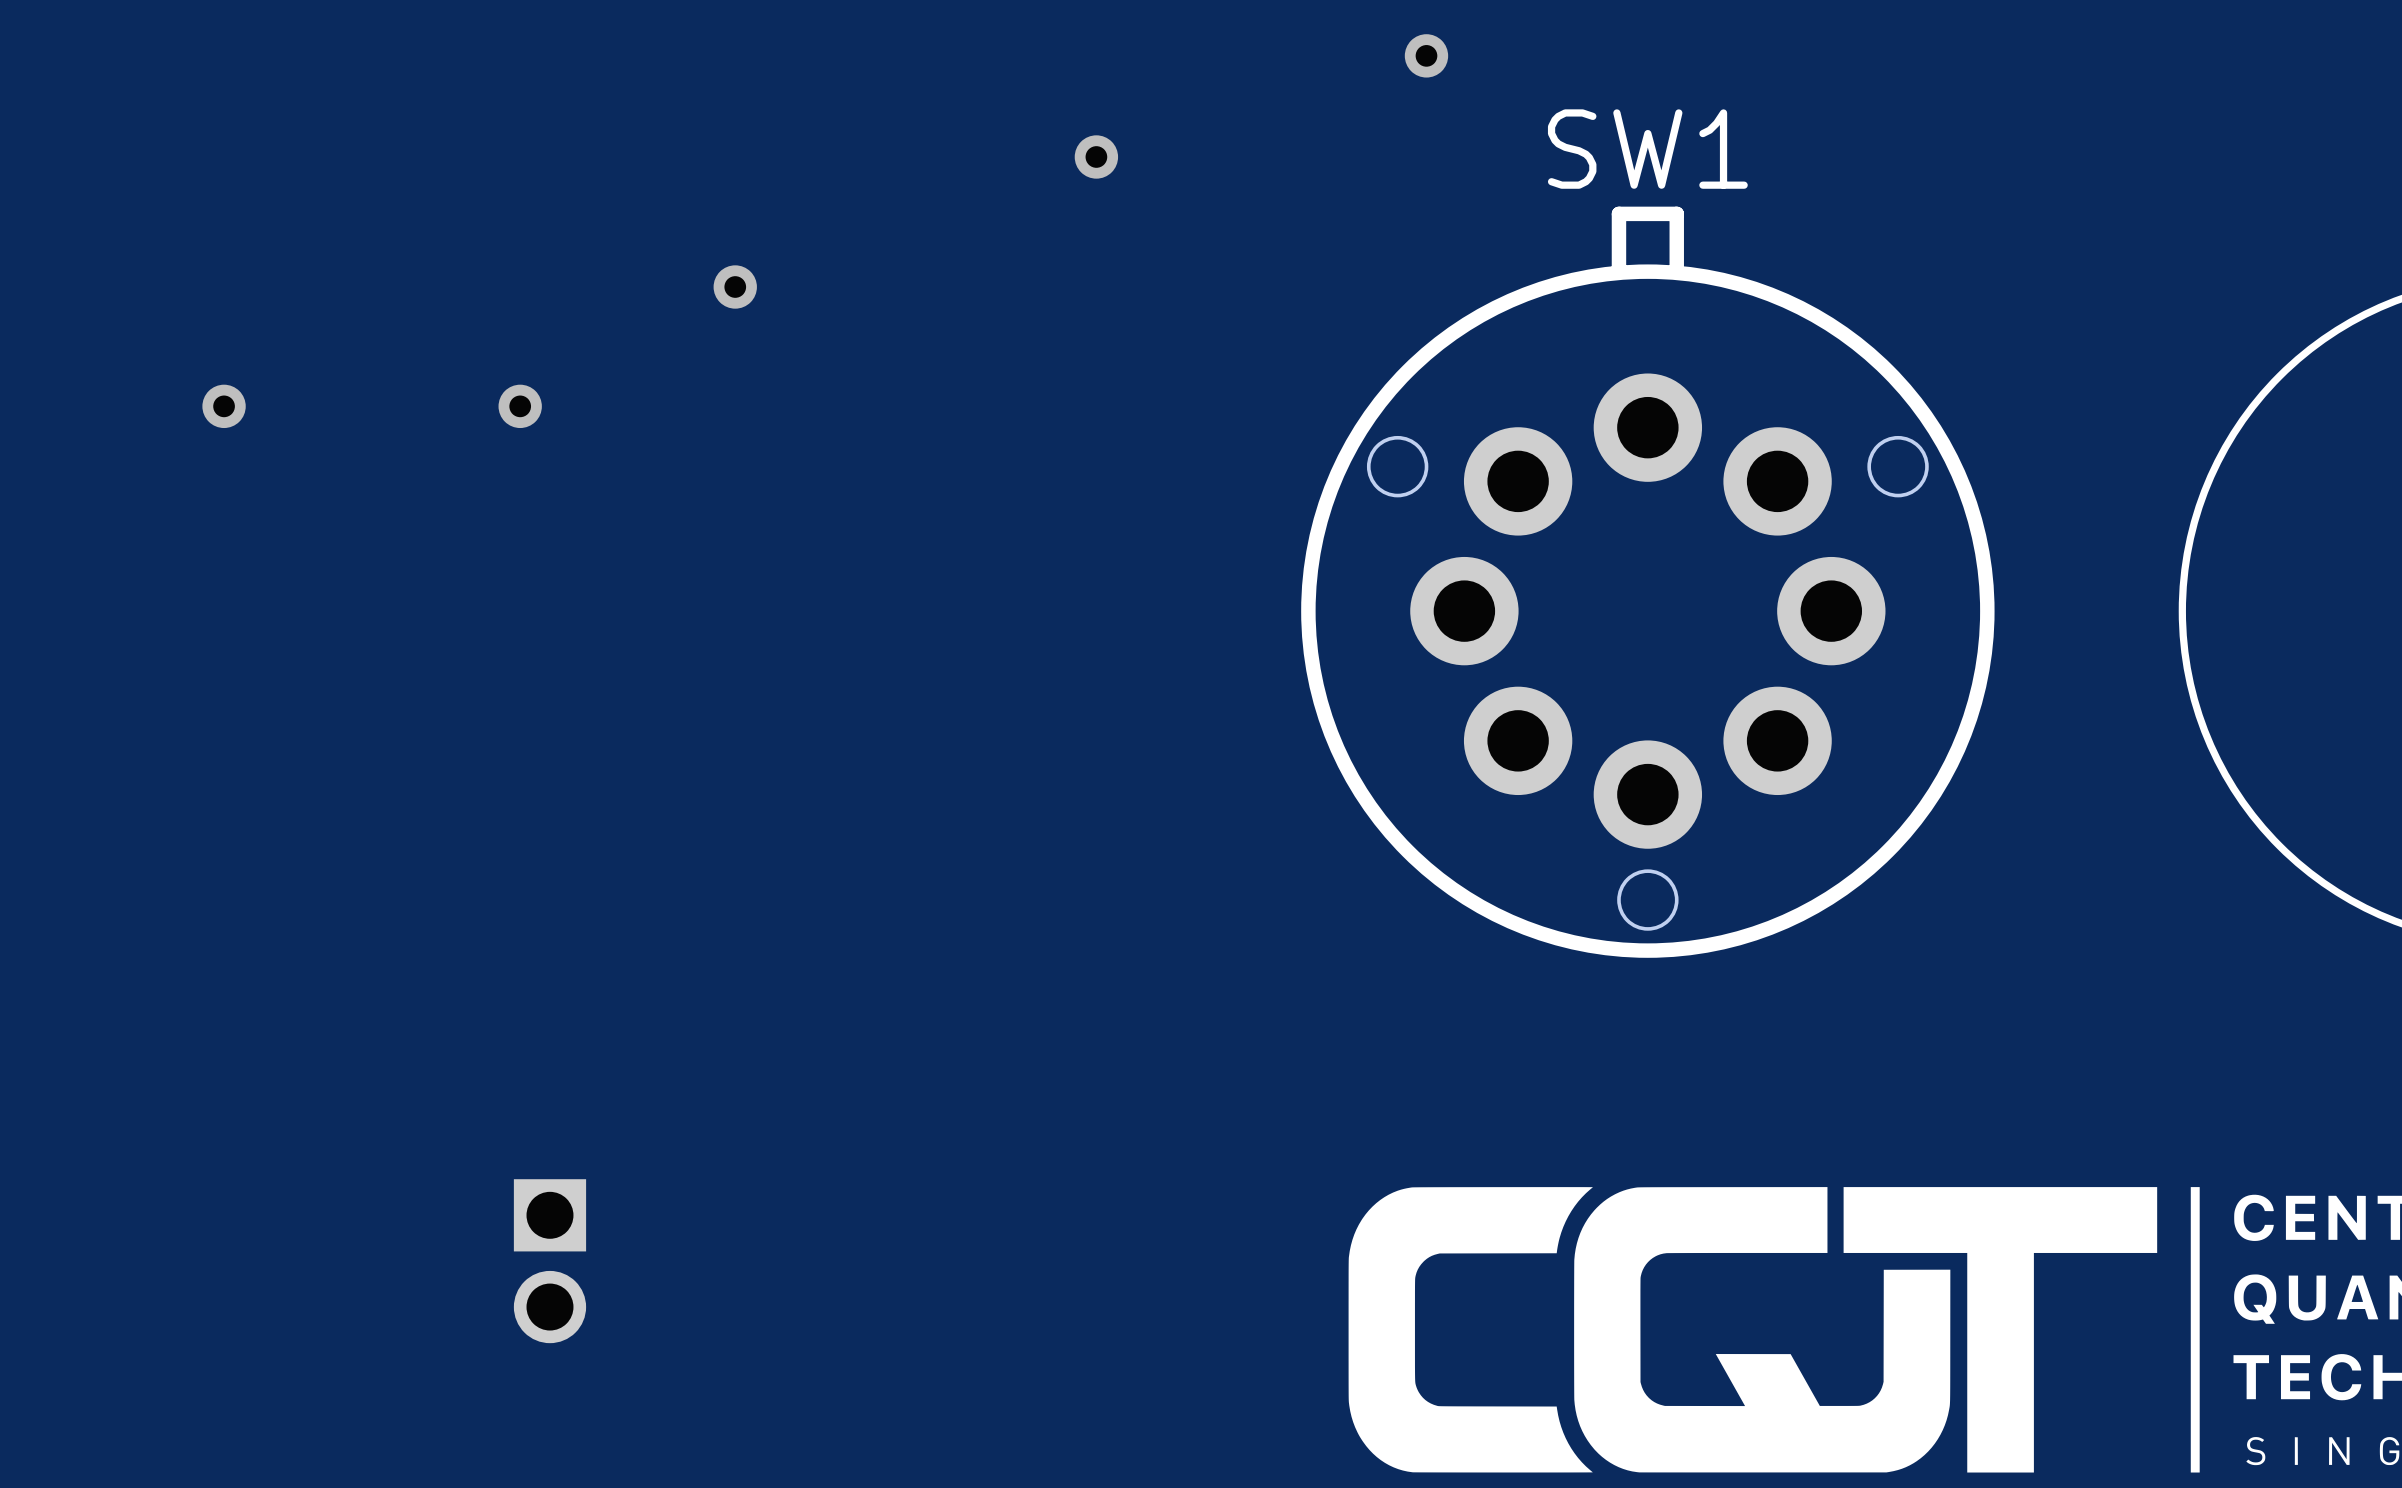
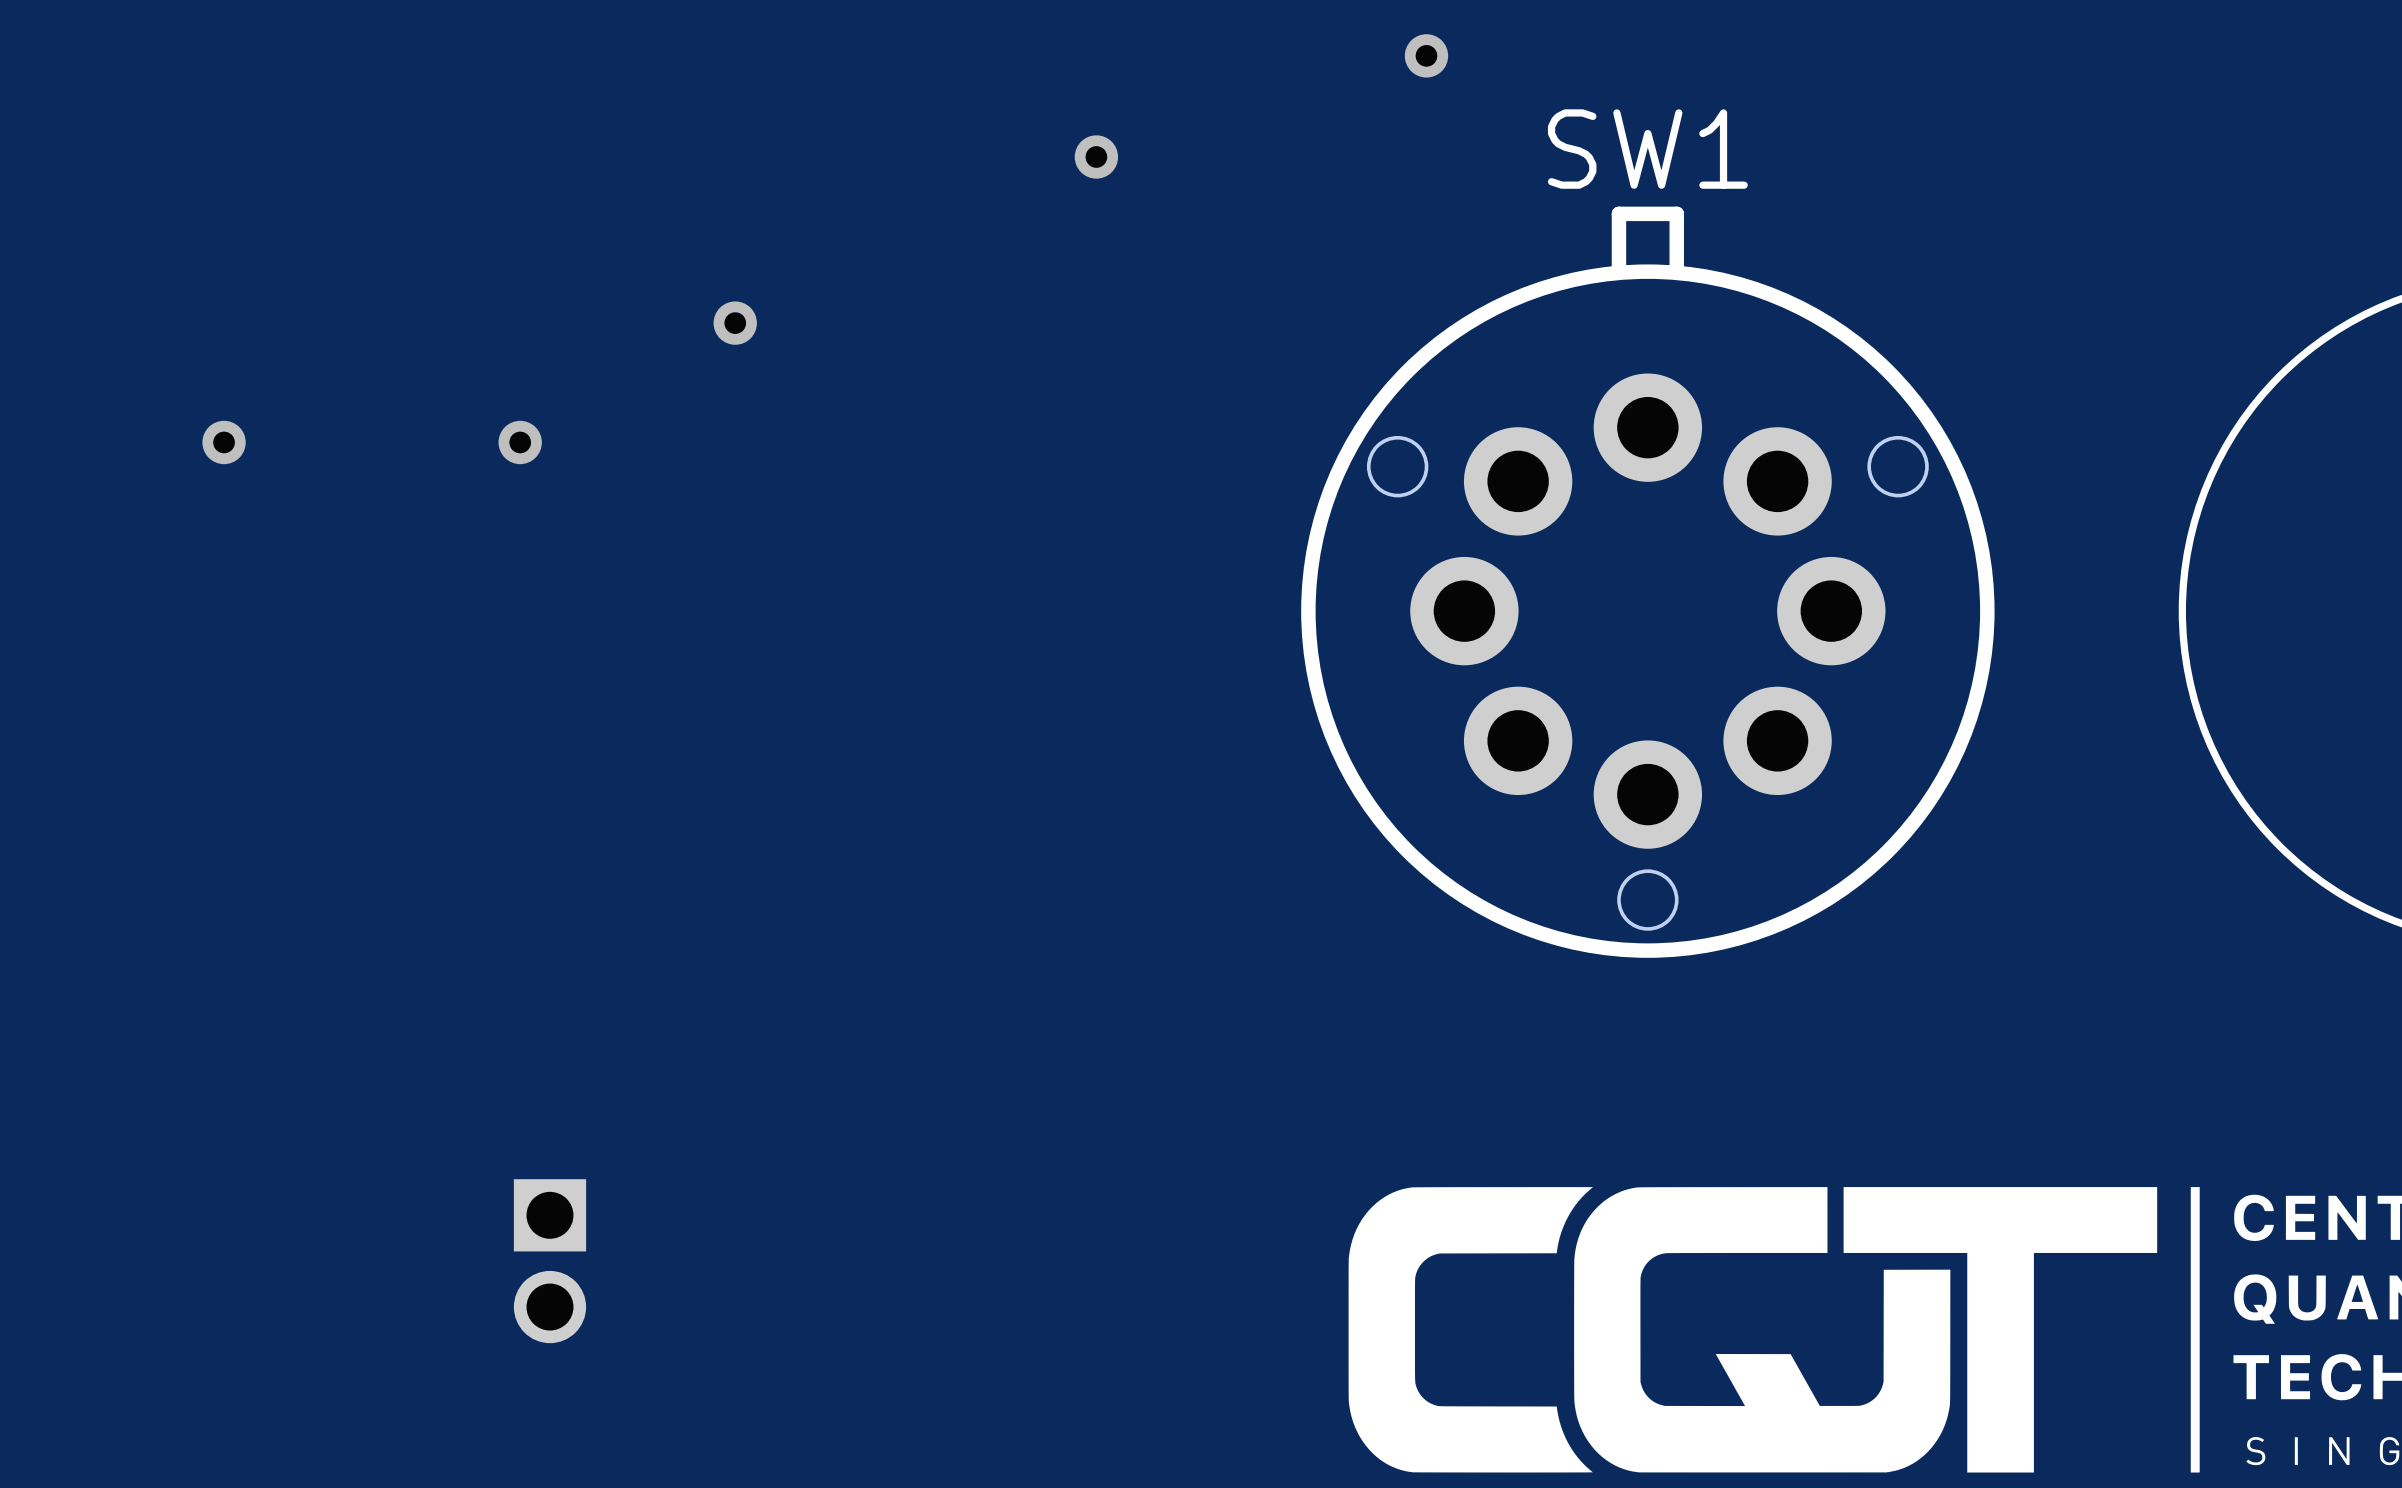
via position: (735, 287) -> (735, 323)
via position: (224, 406) -> (224, 442)
via position: (520, 406) -> (520, 442)

